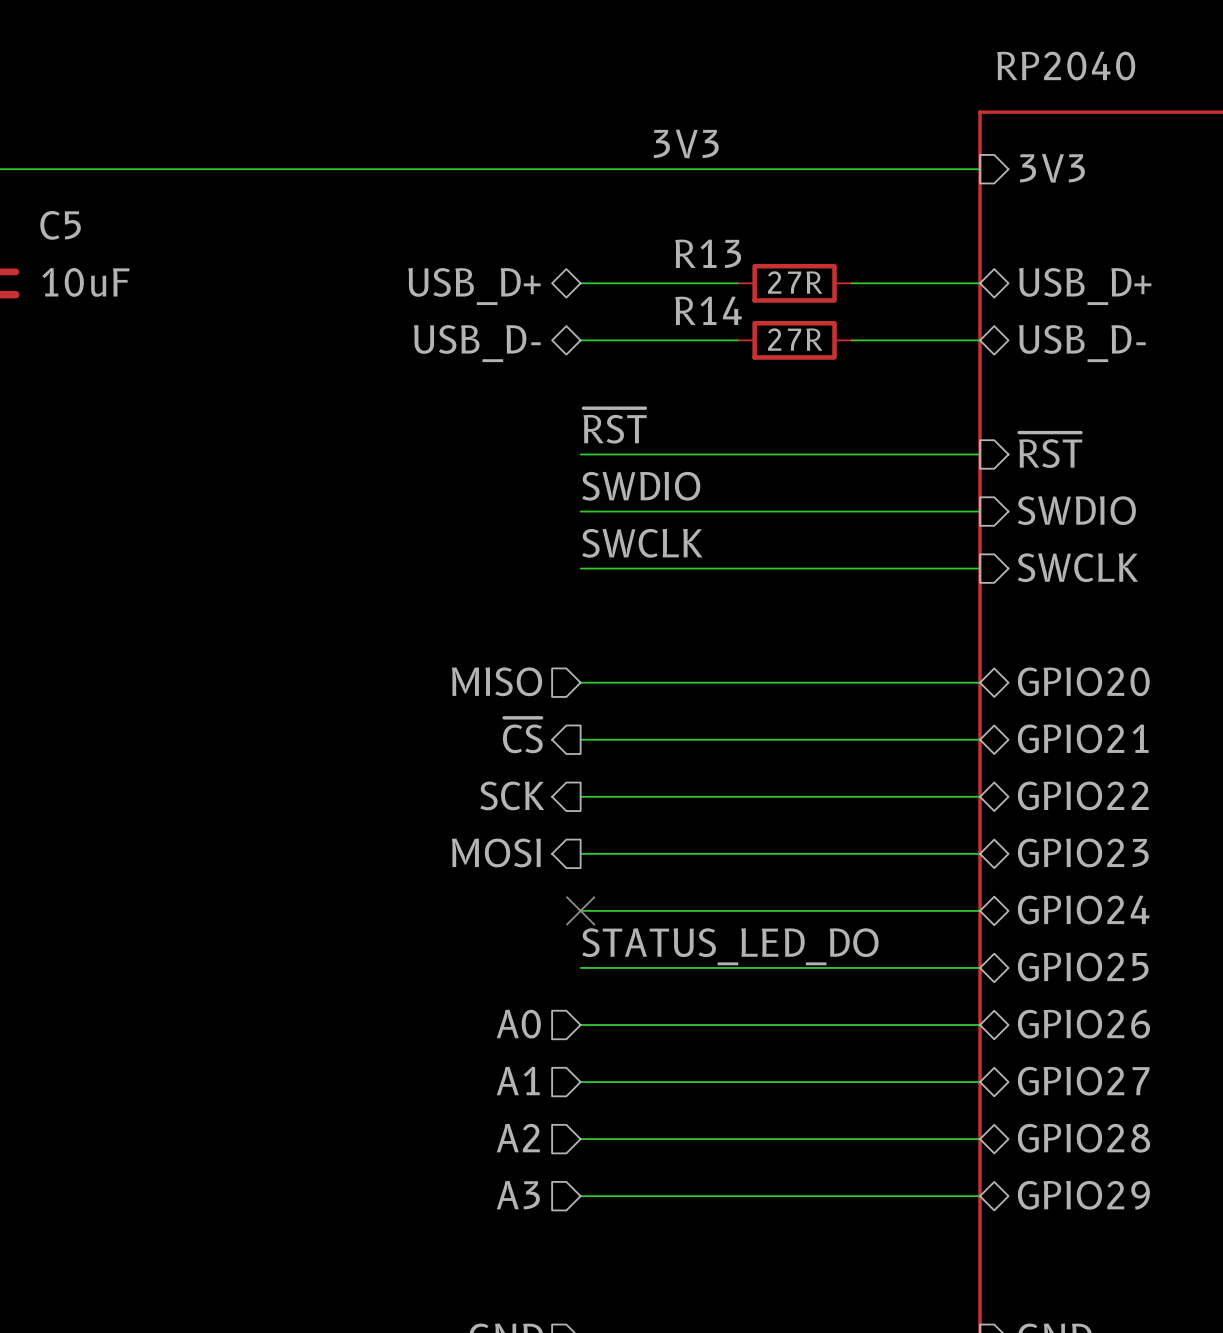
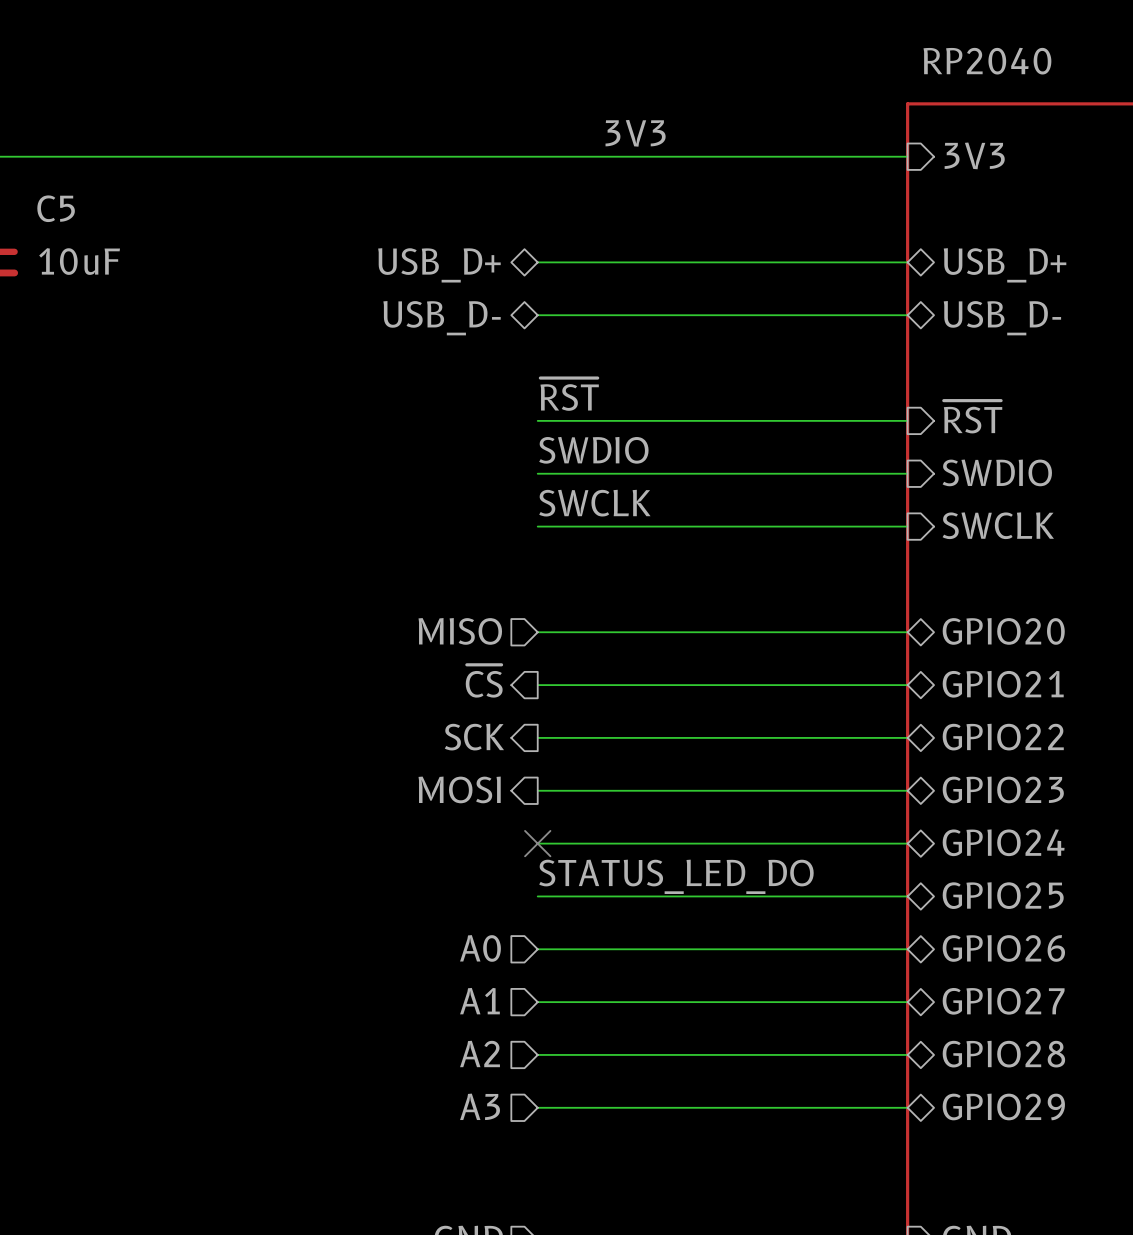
wire: none -> (683, 262) (788, 262)
R13: 27R (794, 283) -> none
wire: none -> (683, 315) (788, 315)
R14: 27R (794, 340) -> none

